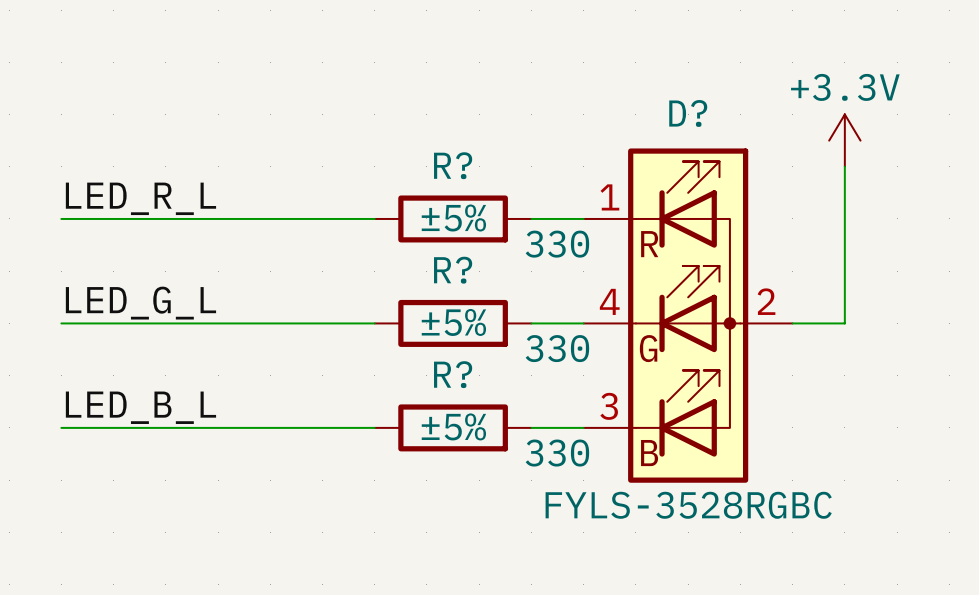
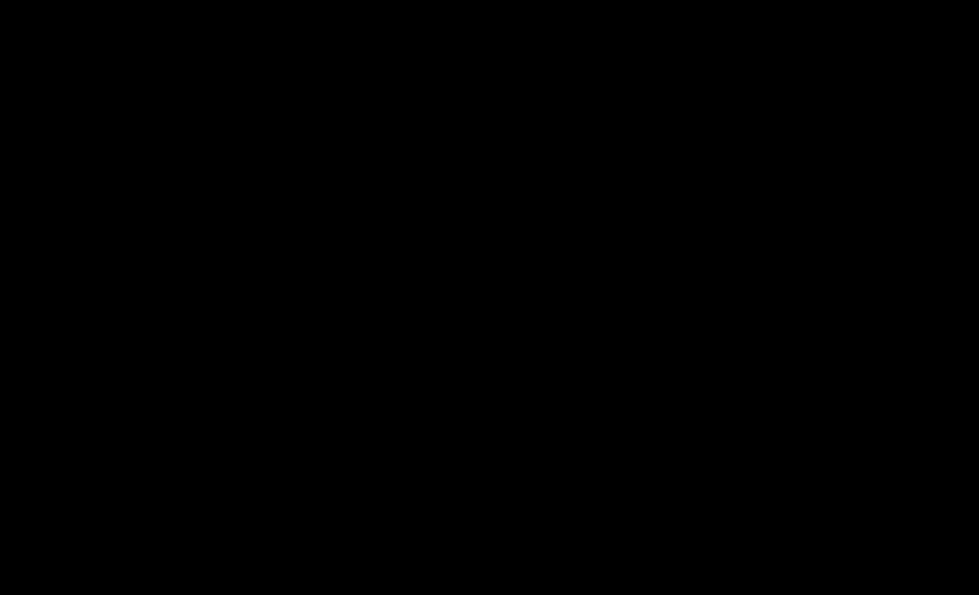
power symbol: +3.3V (844, 140) -> none
wire: (844, 166) (844, 323) (792, 323) -> none
label: LED_R_L (140, 198) -> none
wire: (61, 218) (374, 218) -> none
R?: 330 (453, 218) -> none
wire: (531, 218) (583, 218) -> none
label: LED_G_L (140, 303) -> none
D?: FYLS-3528RGBC (688, 315) -> none
wire: (61, 323) (374, 323) -> none
R?: 330 (453, 323) -> none
wire: (531, 323) (583, 323) -> none
label: LED_B_L (140, 407) -> none
wire: (61, 427) (374, 427) -> none
R?: 330 (453, 427) -> none
wire: (531, 427) (583, 427) -> none

